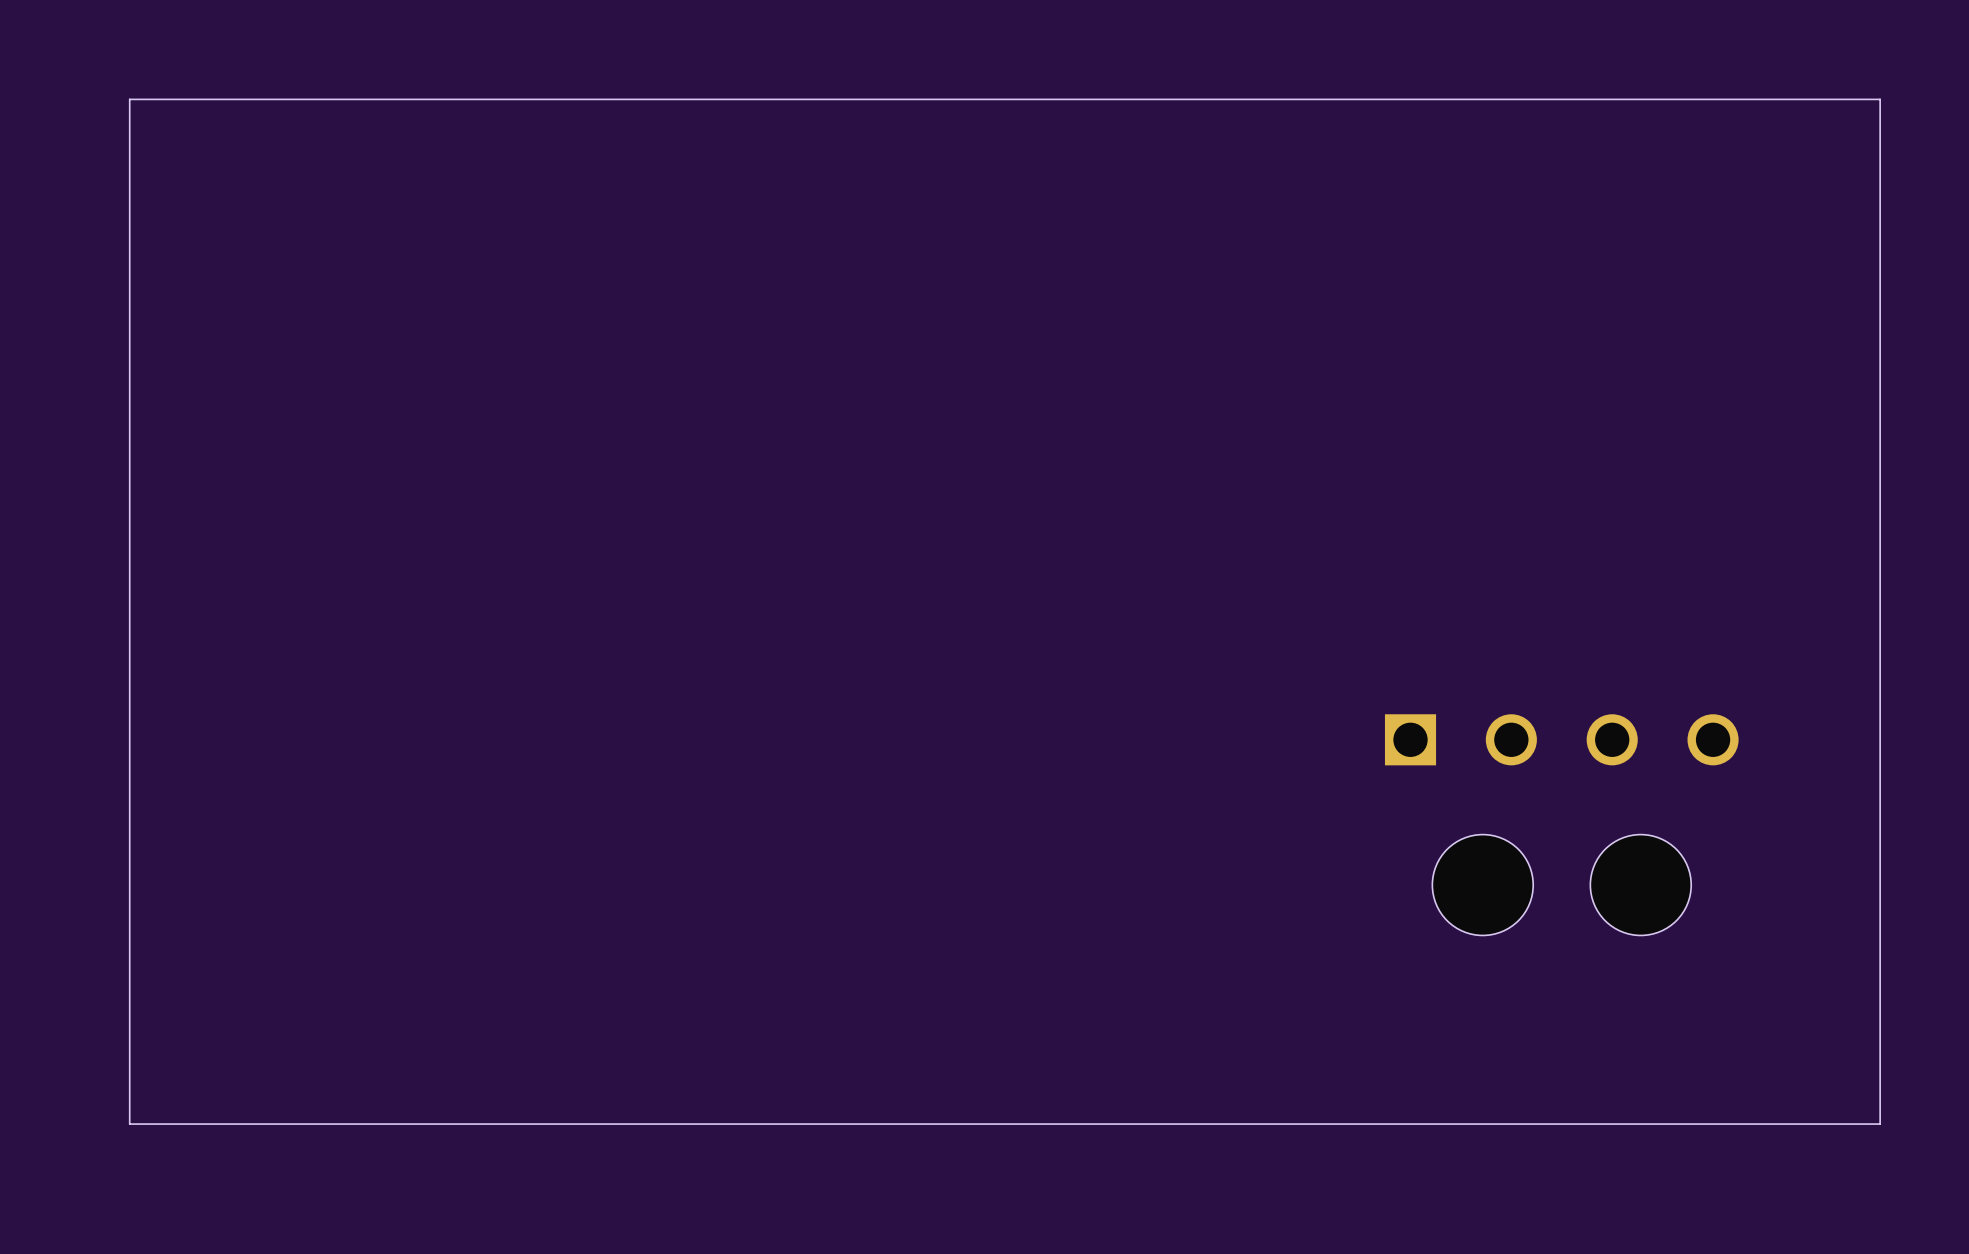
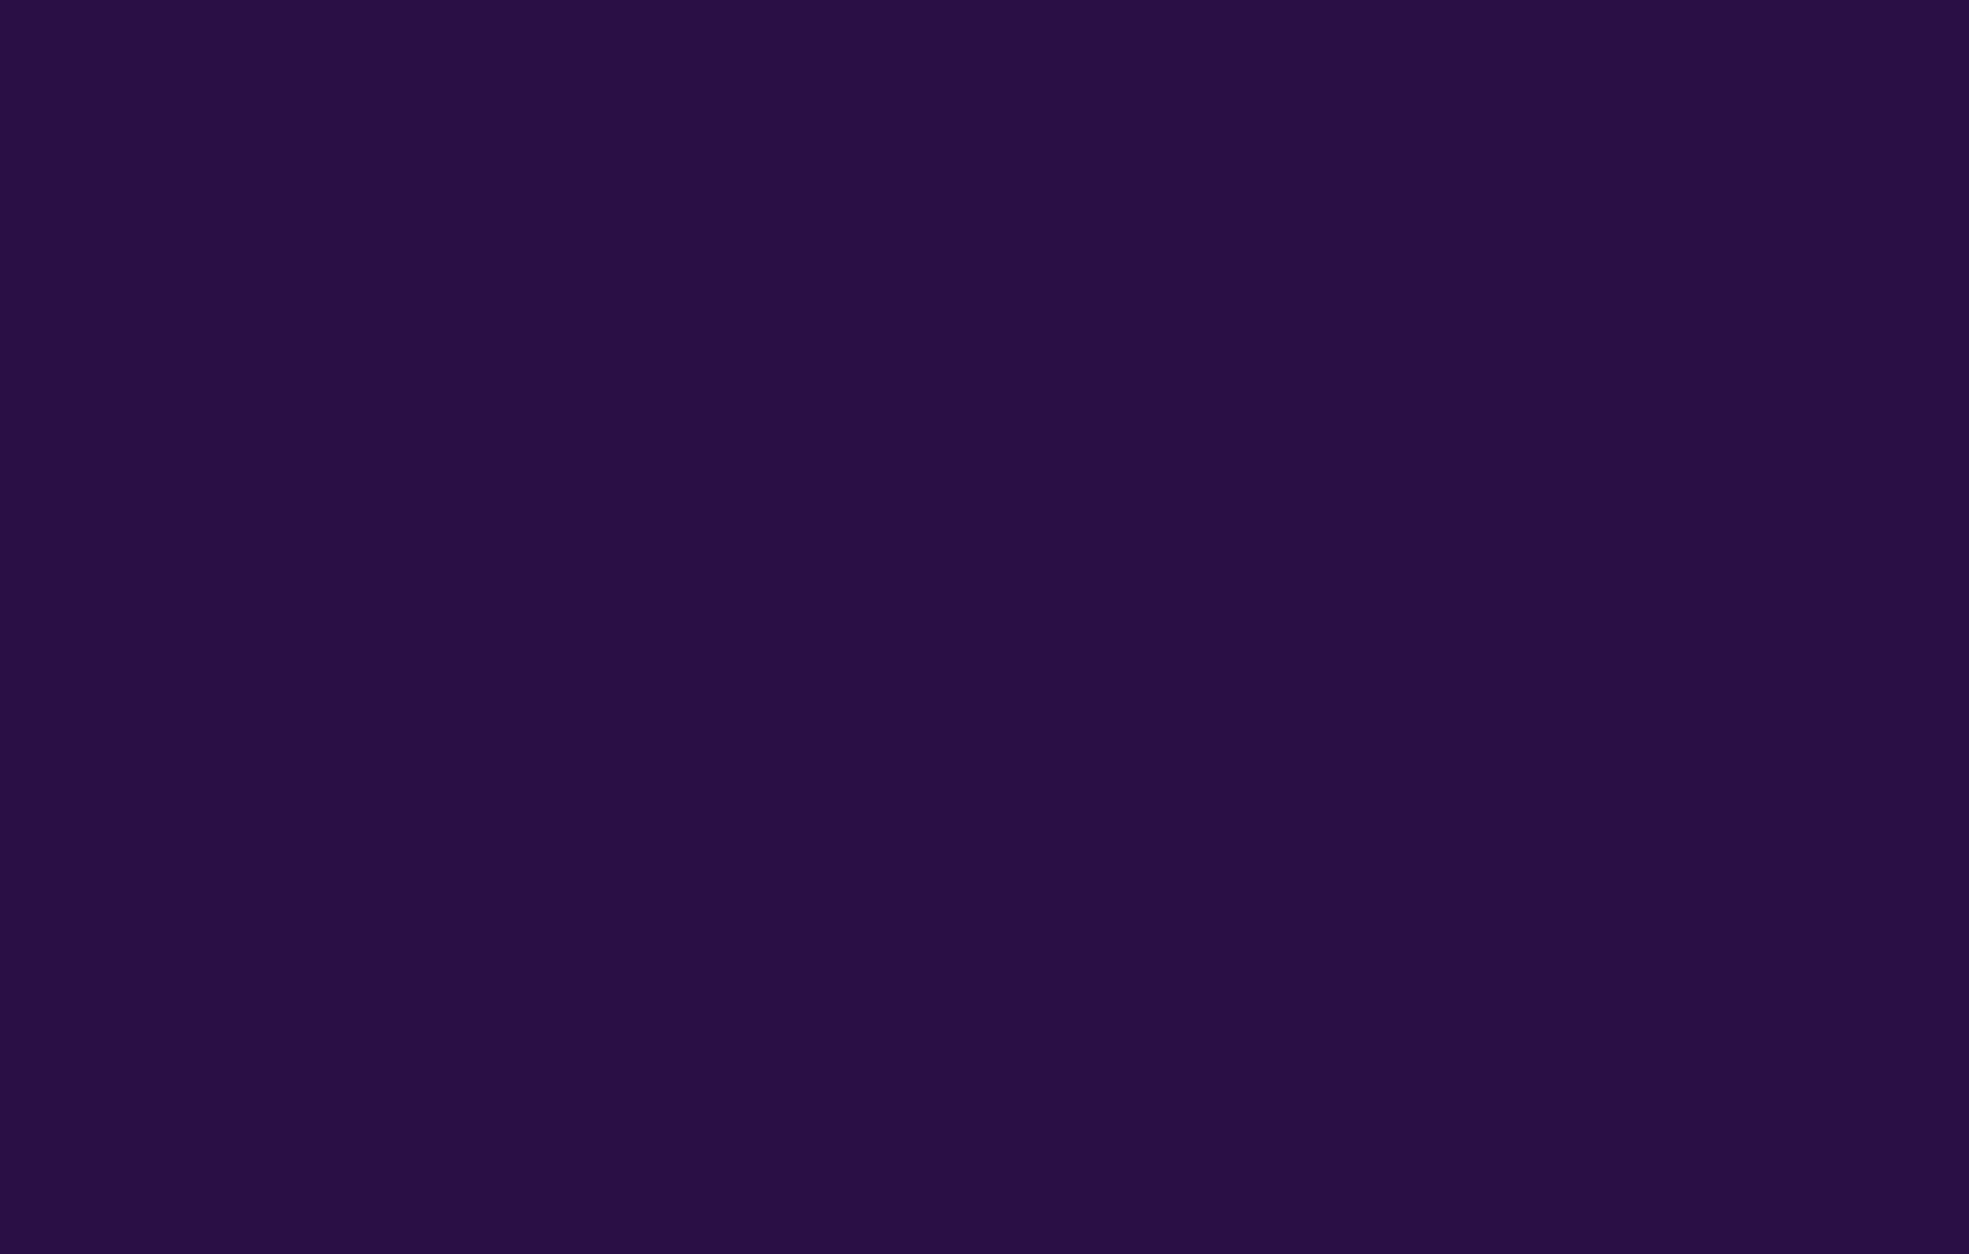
board edge: (1880, 99) (129, 99) (129, 1124) (1880, 1124) (1880, 99) -> none
part: (1561, 824) -> none

